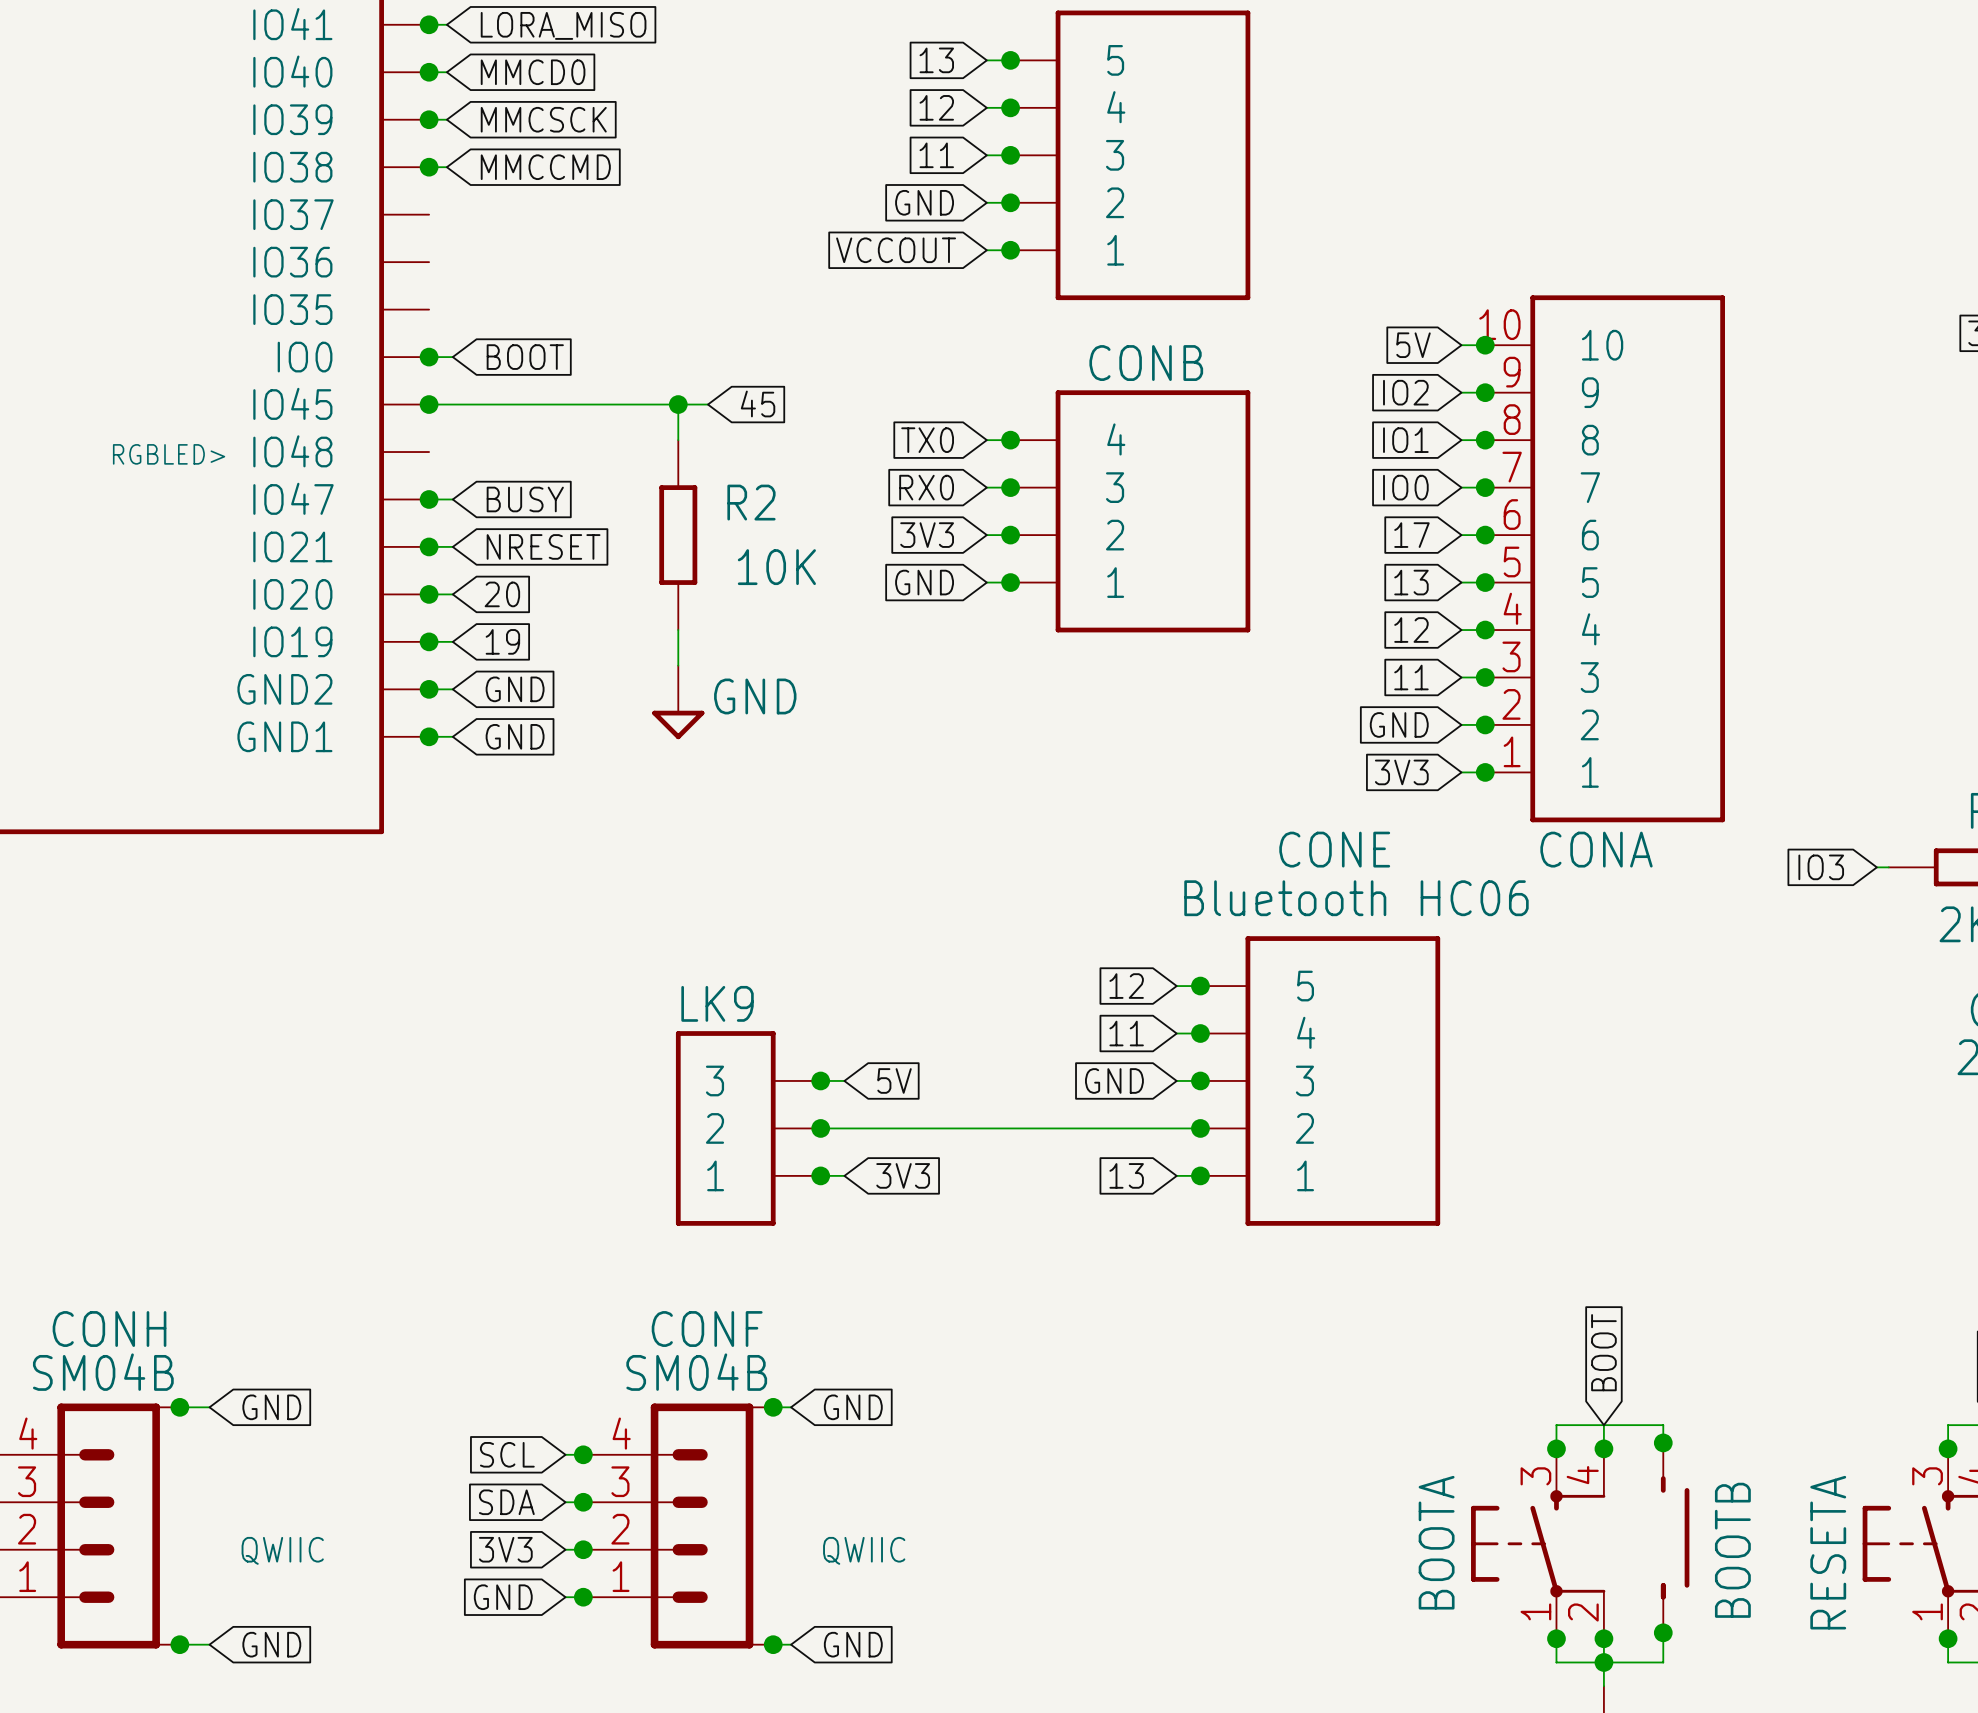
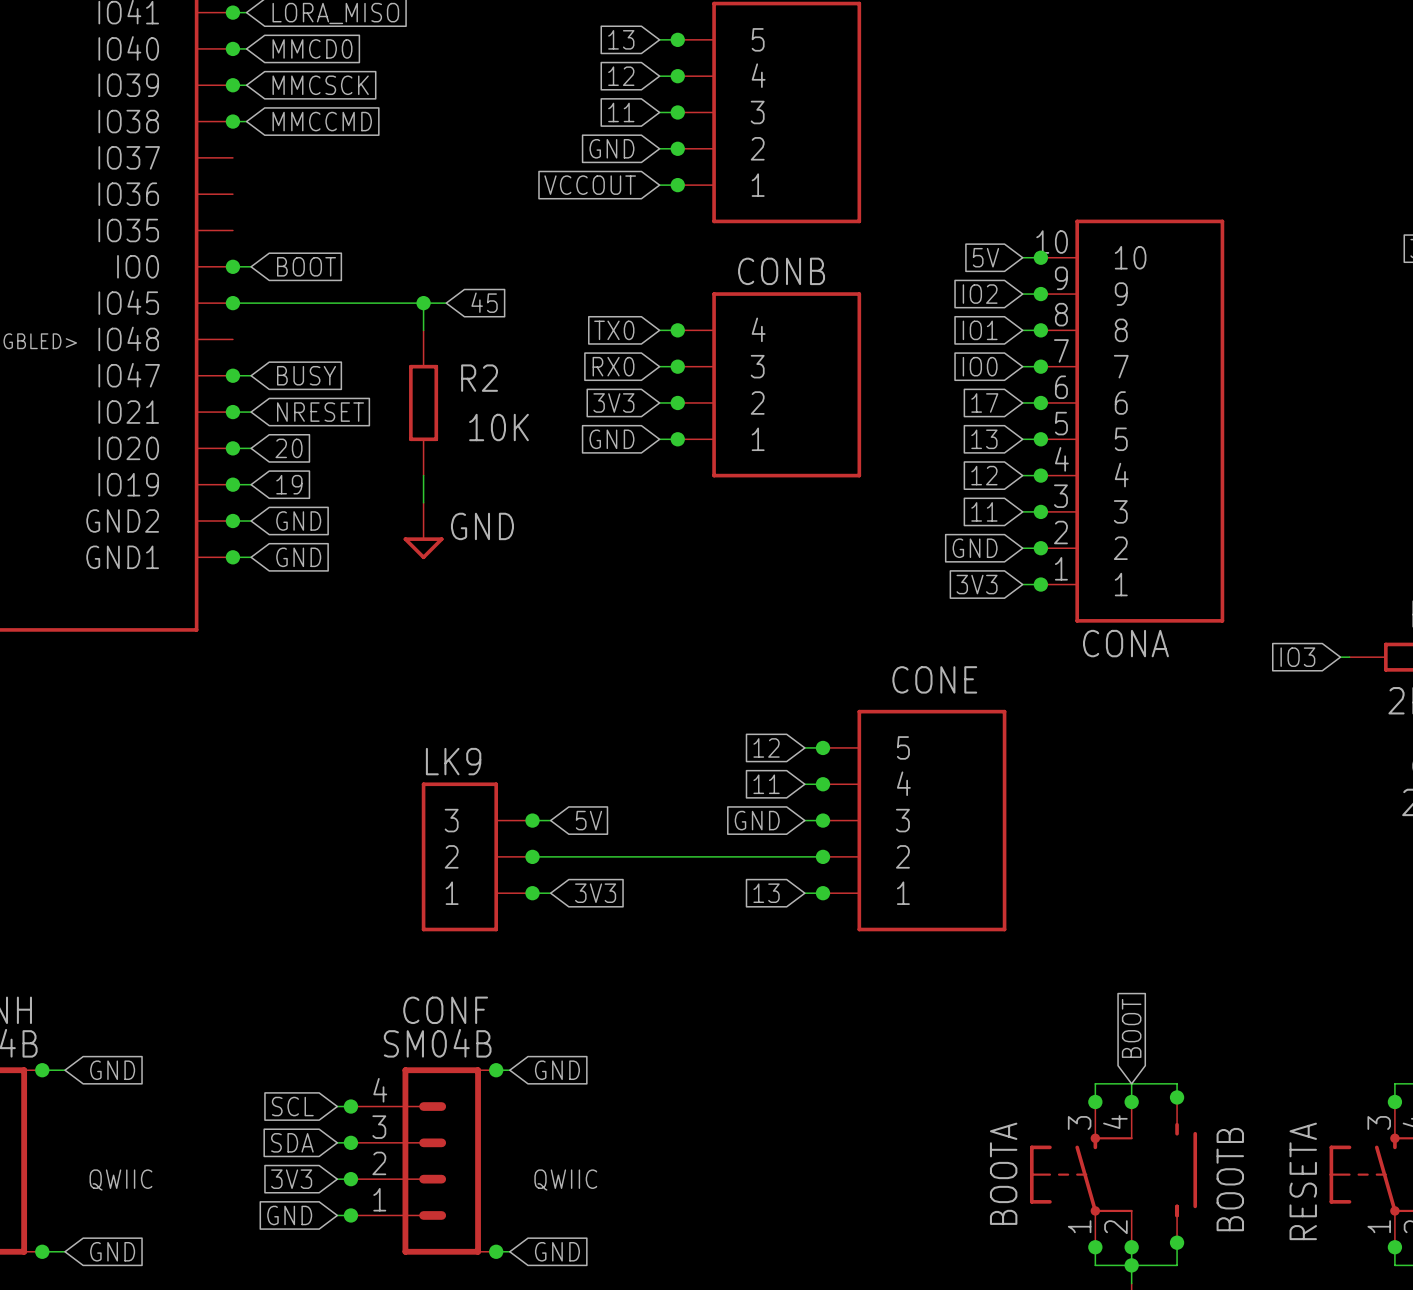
CONE name position: CONE (1334, 849) -> CONE (934, 679)
text: Bluetooth HC06 (1356, 898) -> none

